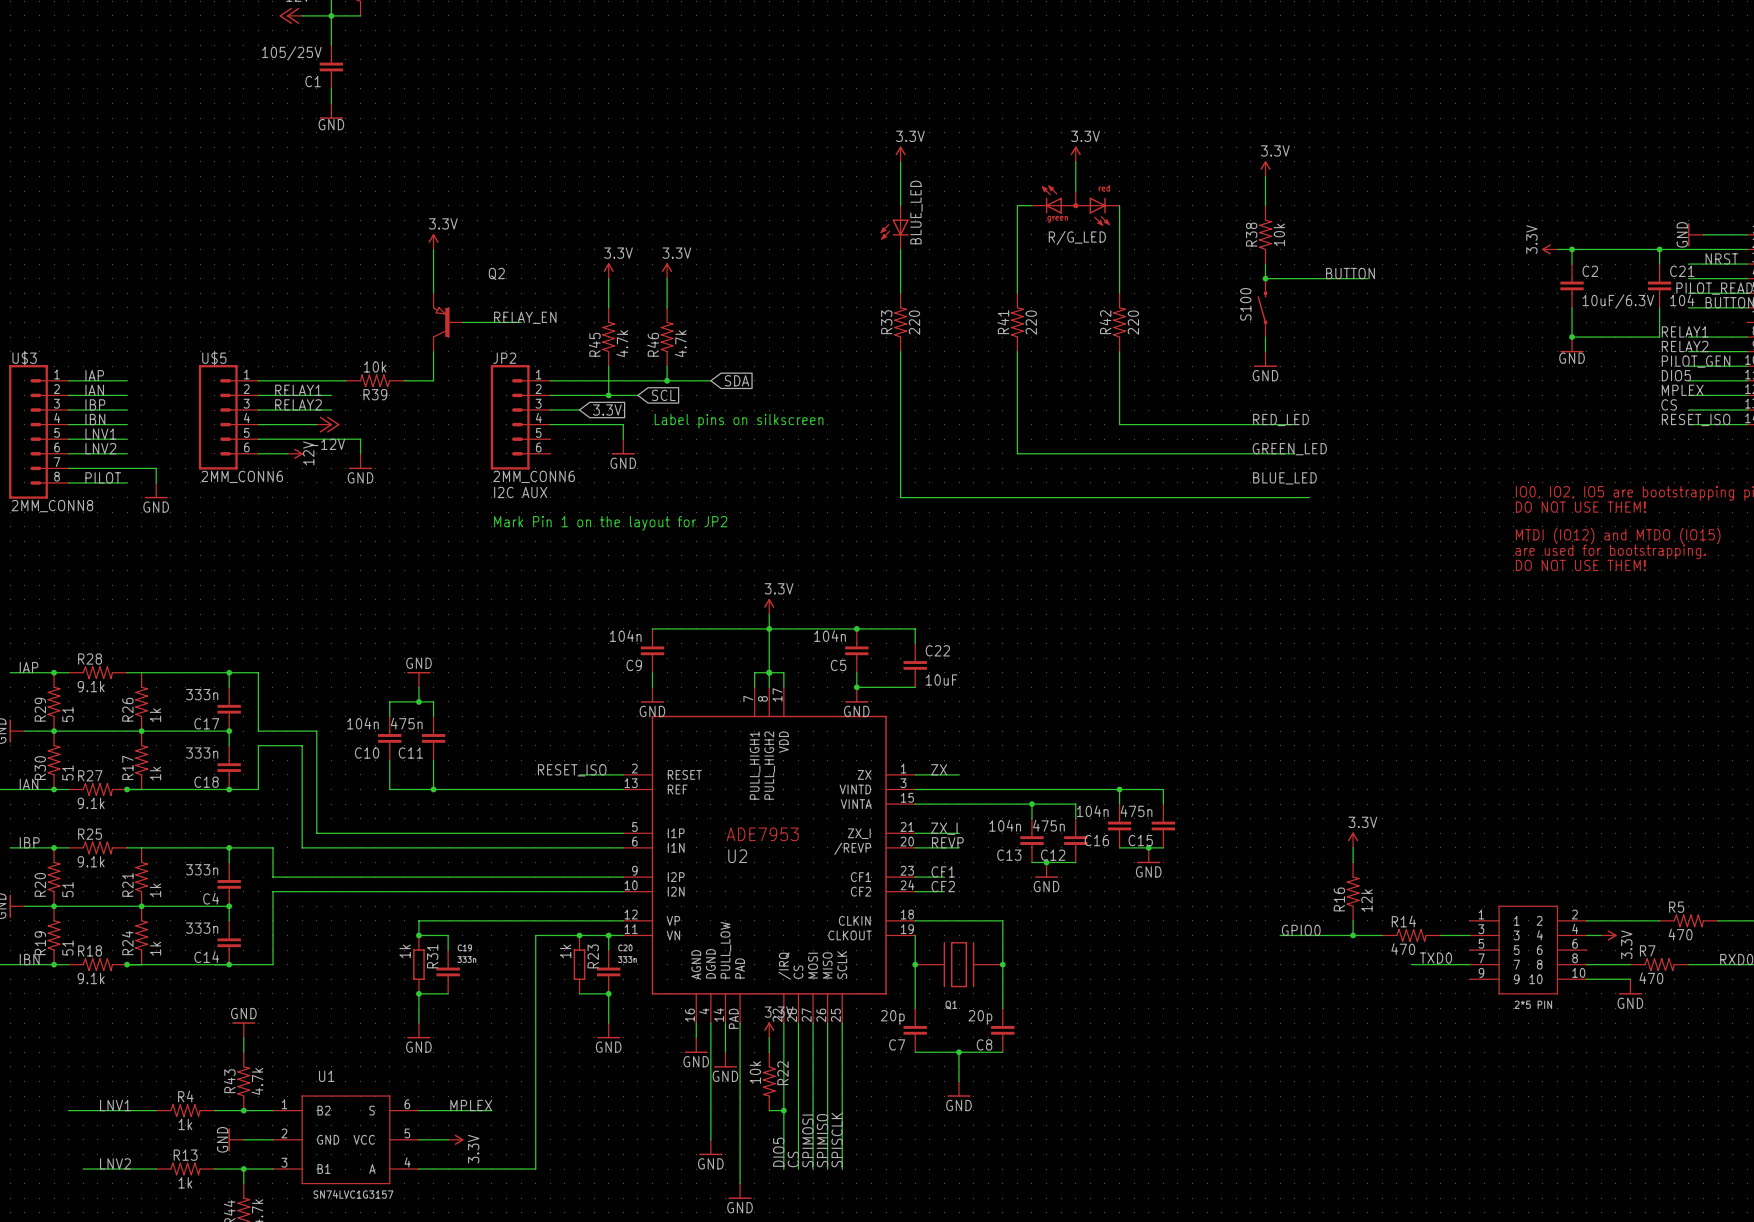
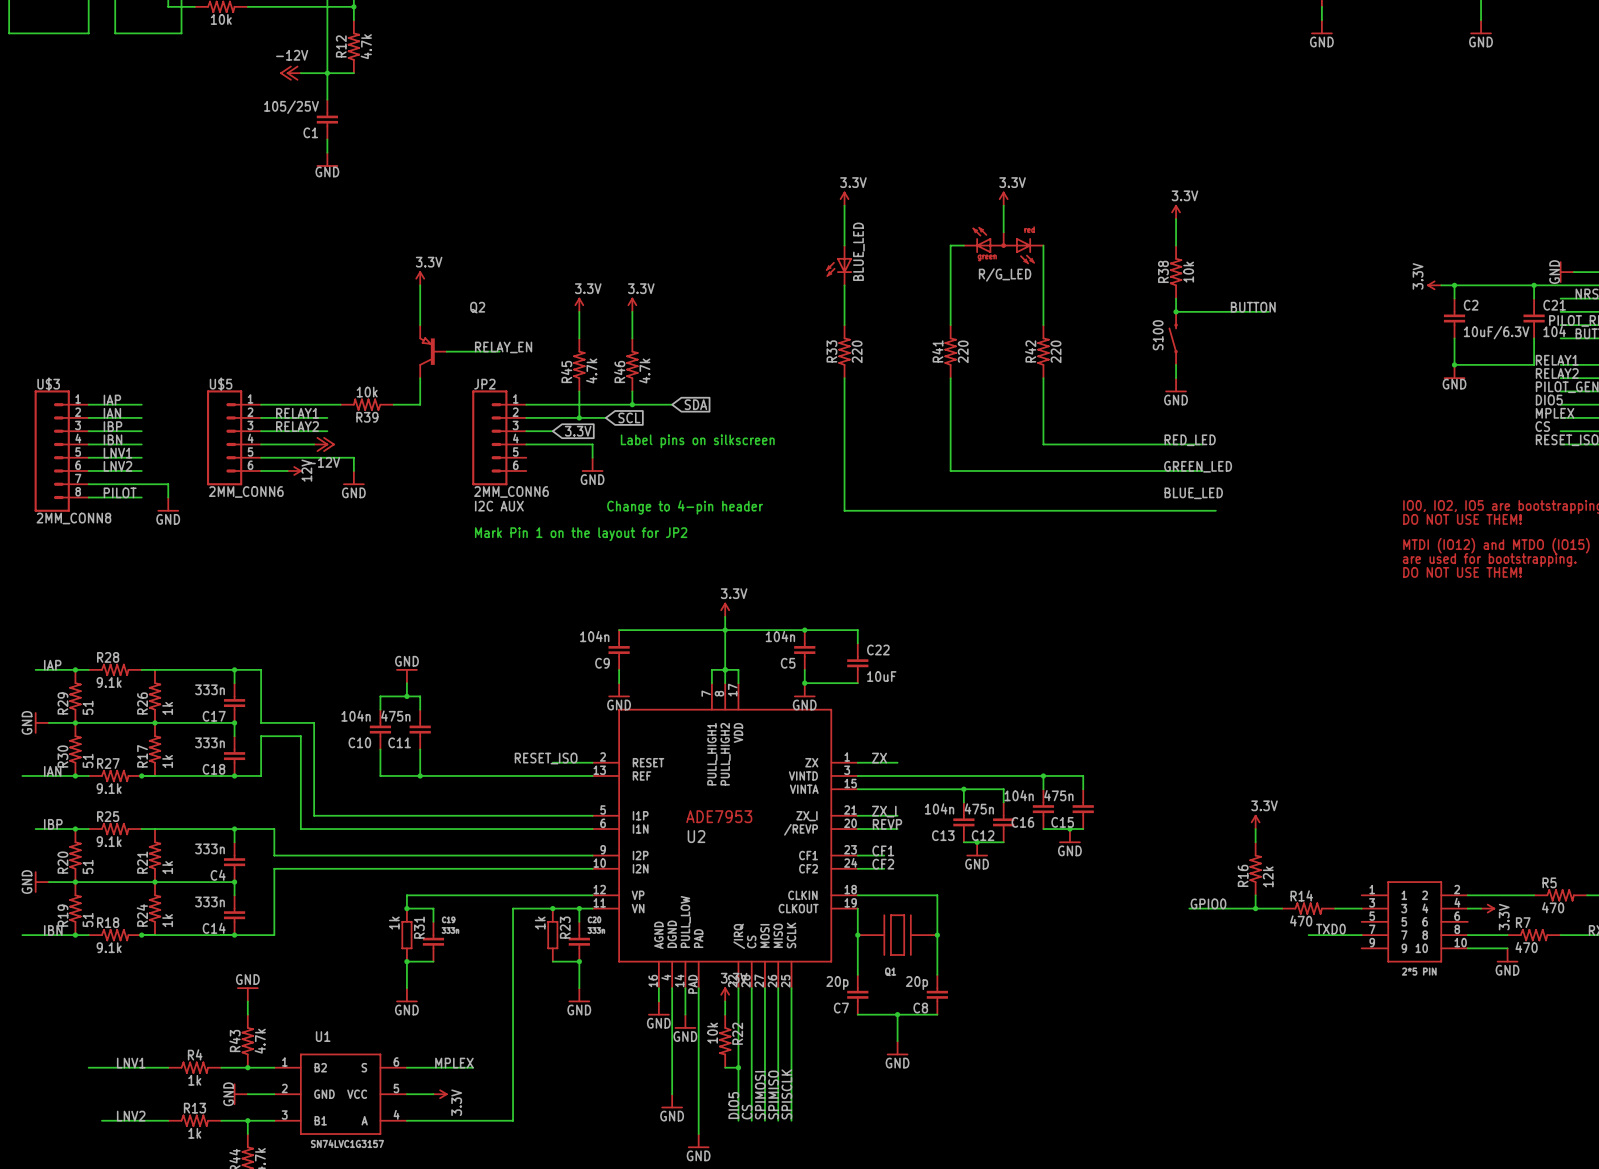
text: none -> Change to 4-pin header (685, 507)

